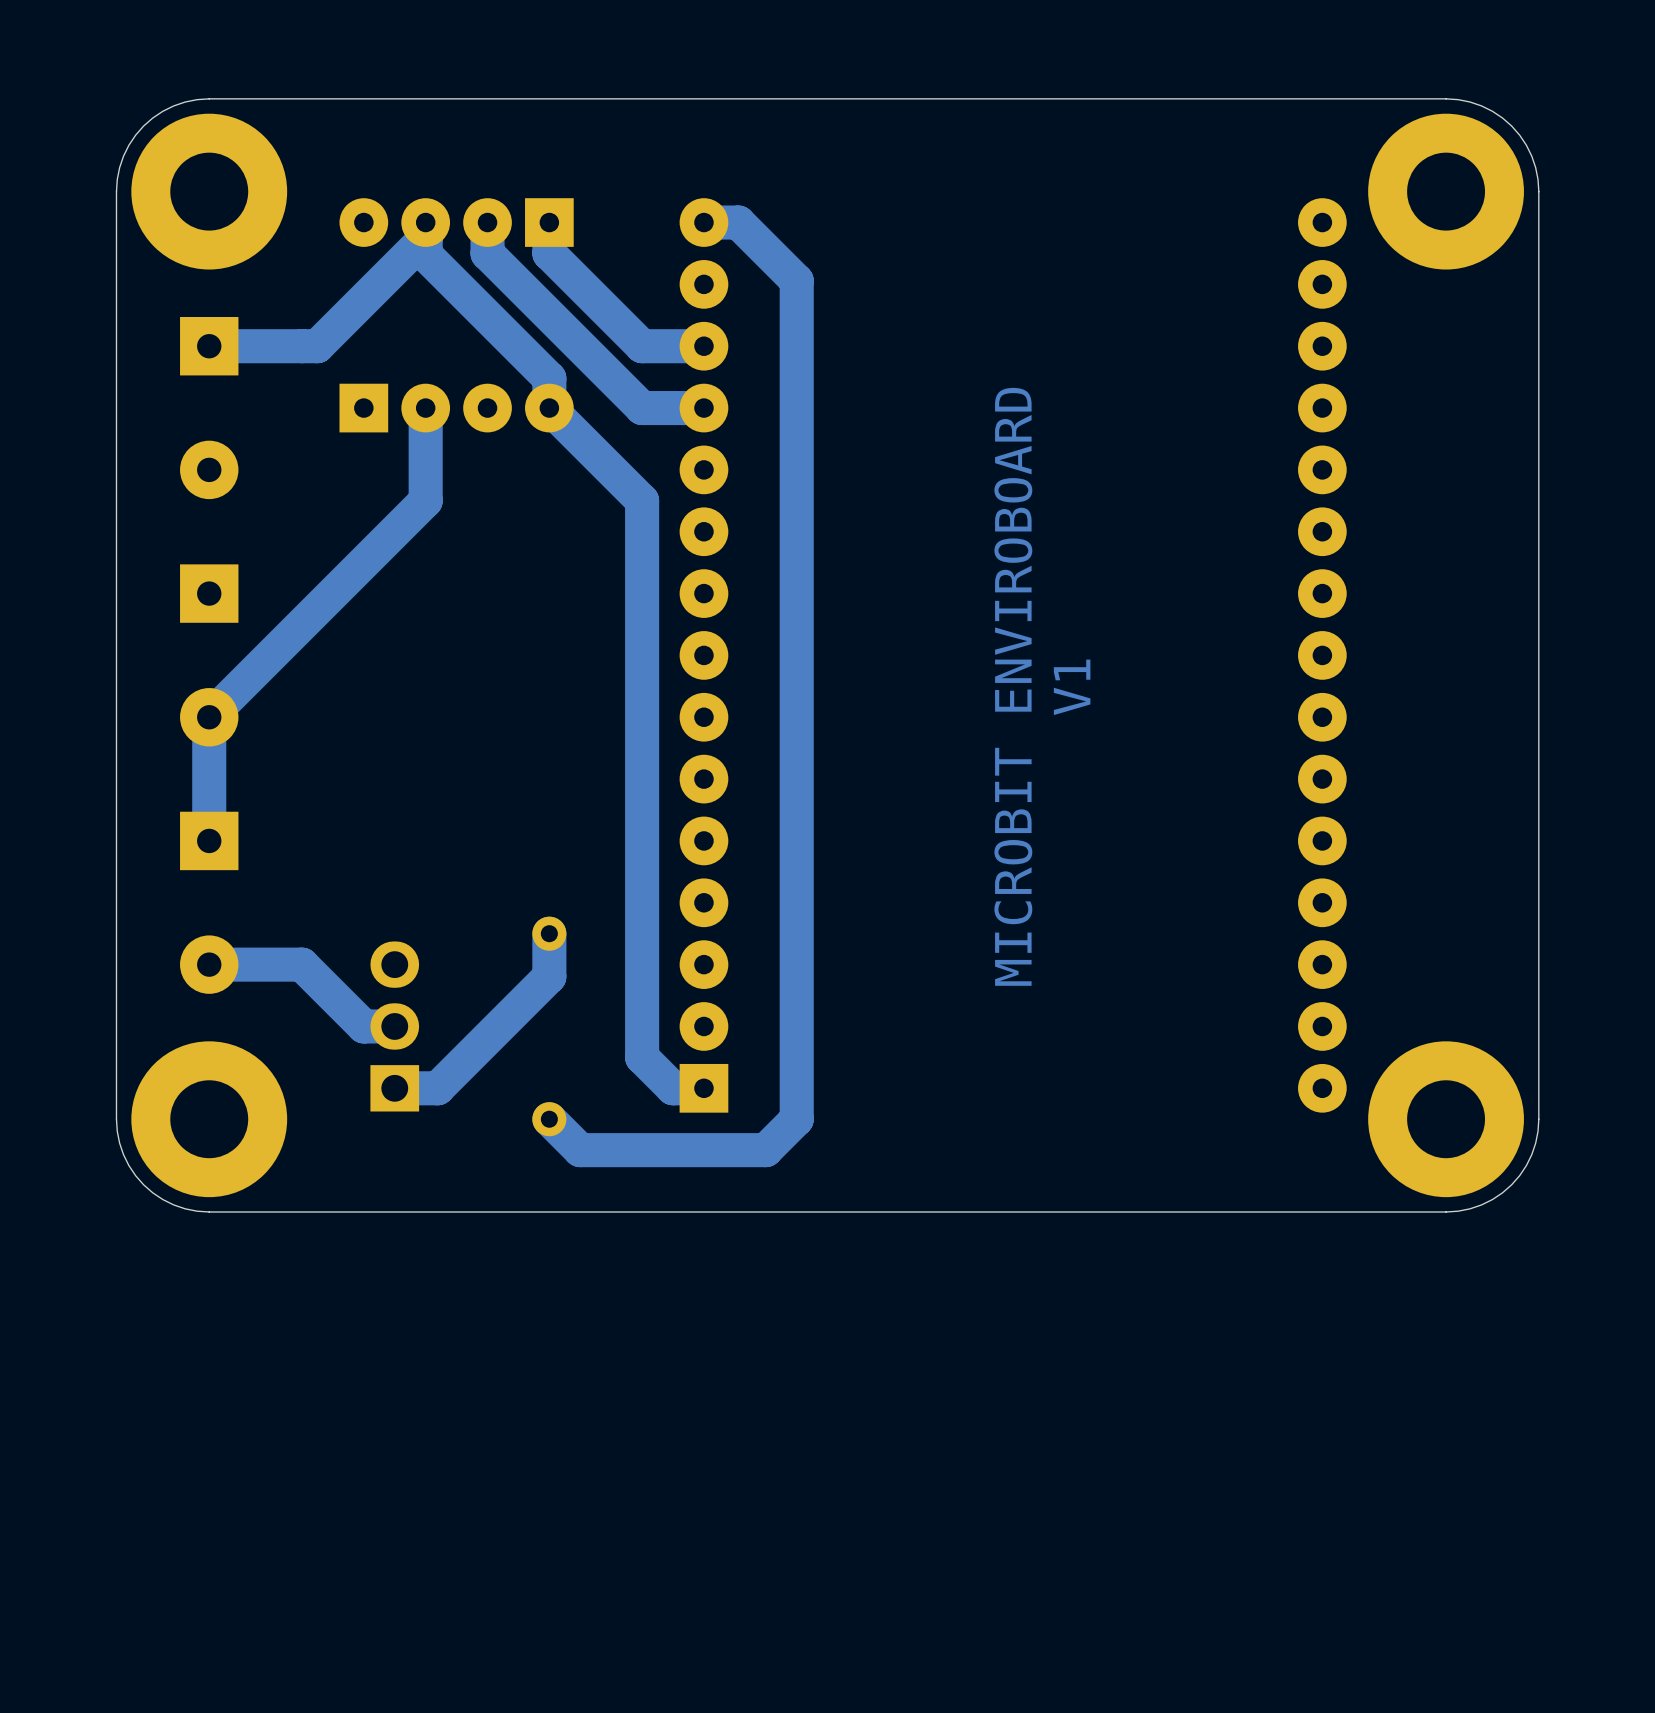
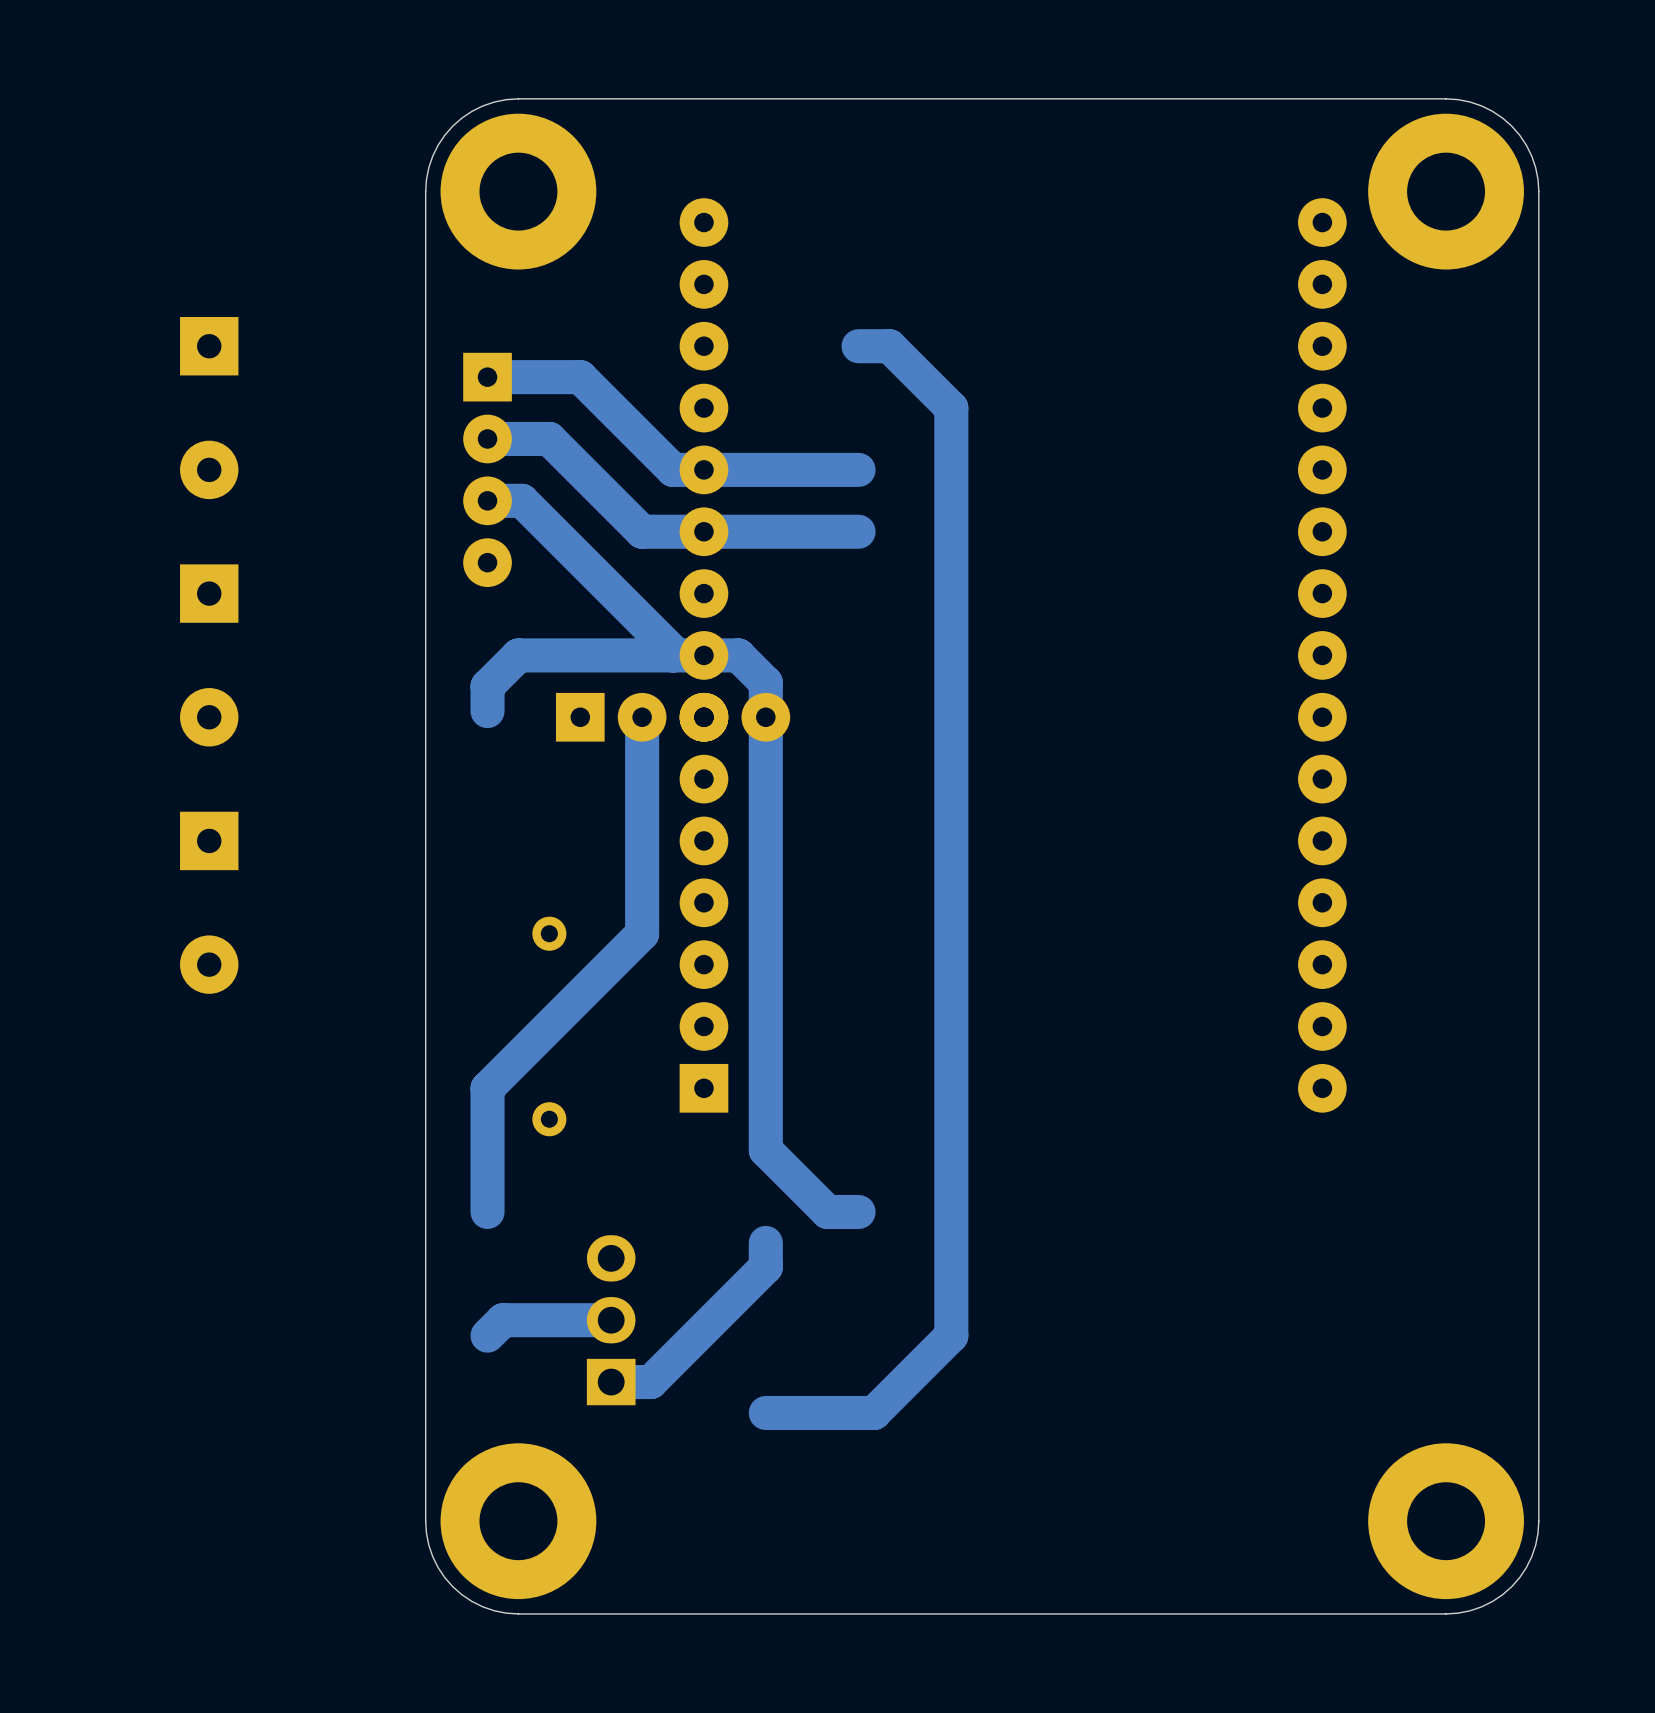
board edge: (518, 98) (197, 99) (173, 105) (152, 118) (135, 135) (123, 156) (119, 167) (116, 191) (116, 1119) (119, 1143) (123, 1154) (135, 1175) (143, 1184) (152, 1192) (173, 1204) (185, 1208) (209, 1211) (1446, 1211) (1458, 1211) (1481, 1204) (1492, 1199) (1511, 1184) (1526, 1165) (1531, 1154) (1538, 1131) (1538, 1119) -> (518, 98) (506, 99) (482, 105) (472, 111) (452, 126) (444, 135) (432, 156) (428, 167) (425, 191) (425, 1521) (428, 1545) (432, 1556) (444, 1577) (452, 1586) (461, 1594) (482, 1606) (494, 1610) (518, 1613) (1446, 1613) (1458, 1613) (1481, 1606) (1502, 1594) (1519, 1577) (1531, 1556) (1538, 1533) (1538, 1119)
part position: (209, 191) -> (518, 191)
track: (549, 219) (549, 253) (642, 346) (703, 346) -> none
track: (425, 222) (425, 254) (549, 378) (549, 408) (642, 500) (642, 717) -> none
part: (456, 222) -> none
track: (703, 222) (738, 222) (796, 280) (796, 1119) (765, 1150) (580, 1150) (549, 1119) -> none
track: (487, 226) (487, 253) (642, 408) (703, 408) -> none
track: (425, 237) (317, 346) (209, 346) -> none
track: none -> (858, 346) (889, 346) (951, 408) (951, 1335) (874, 1412) (765, 1412)
track: none -> (487, 377) (580, 377) (673, 469) (858, 469)
track: (425, 408) (425, 500) (209, 717) (209, 840) -> none
part rotation: 0° (456, 408) -> 90° clockwise (487, 469)
track: none -> (487, 438) (549, 438) (642, 531) (858, 531)
track: none -> (487, 500) (521, 500) (673, 651) (673, 655)
text: MICROBIT ENVIROBOARD (1013, 686) -> none
text: V1 (1072, 687) -> none
track: none -> (487, 711) (487, 686) (518, 655) (738, 655) (765, 682) (765, 1150) (827, 1211) (858, 1211)
part: none -> (673, 717)
track: (549, 933) (549, 976) (437, 1088) (394, 1088) -> none
track: (642, 933) (642, 1057) (673, 1088) (703, 1088) -> (642, 933) (487, 1088) (487, 1211)
track: (209, 964) (302, 964) (363, 1026) (394, 1026) -> none
part position: (394, 1026) -> (611, 1320)
part: (209, 1119) -> none
part position: (1446, 1119) -> (1446, 1521)
track: none -> (765, 1242) (765, 1267) (650, 1382) (611, 1382)
track: none -> (611, 1320) (502, 1320) (487, 1335)
part: none -> (518, 1521)

